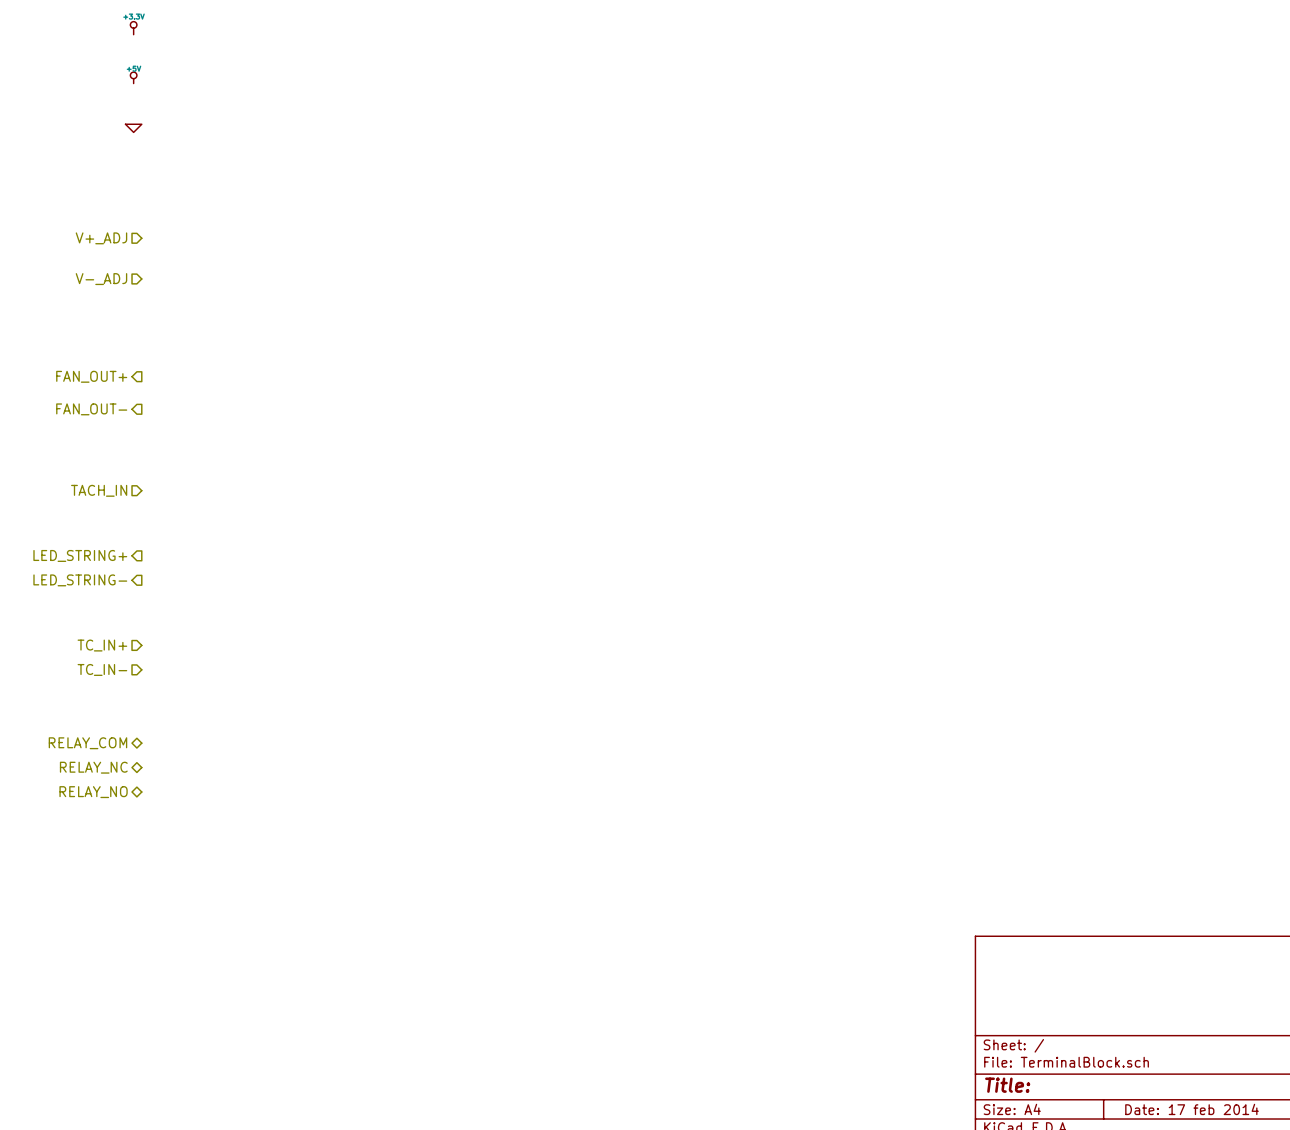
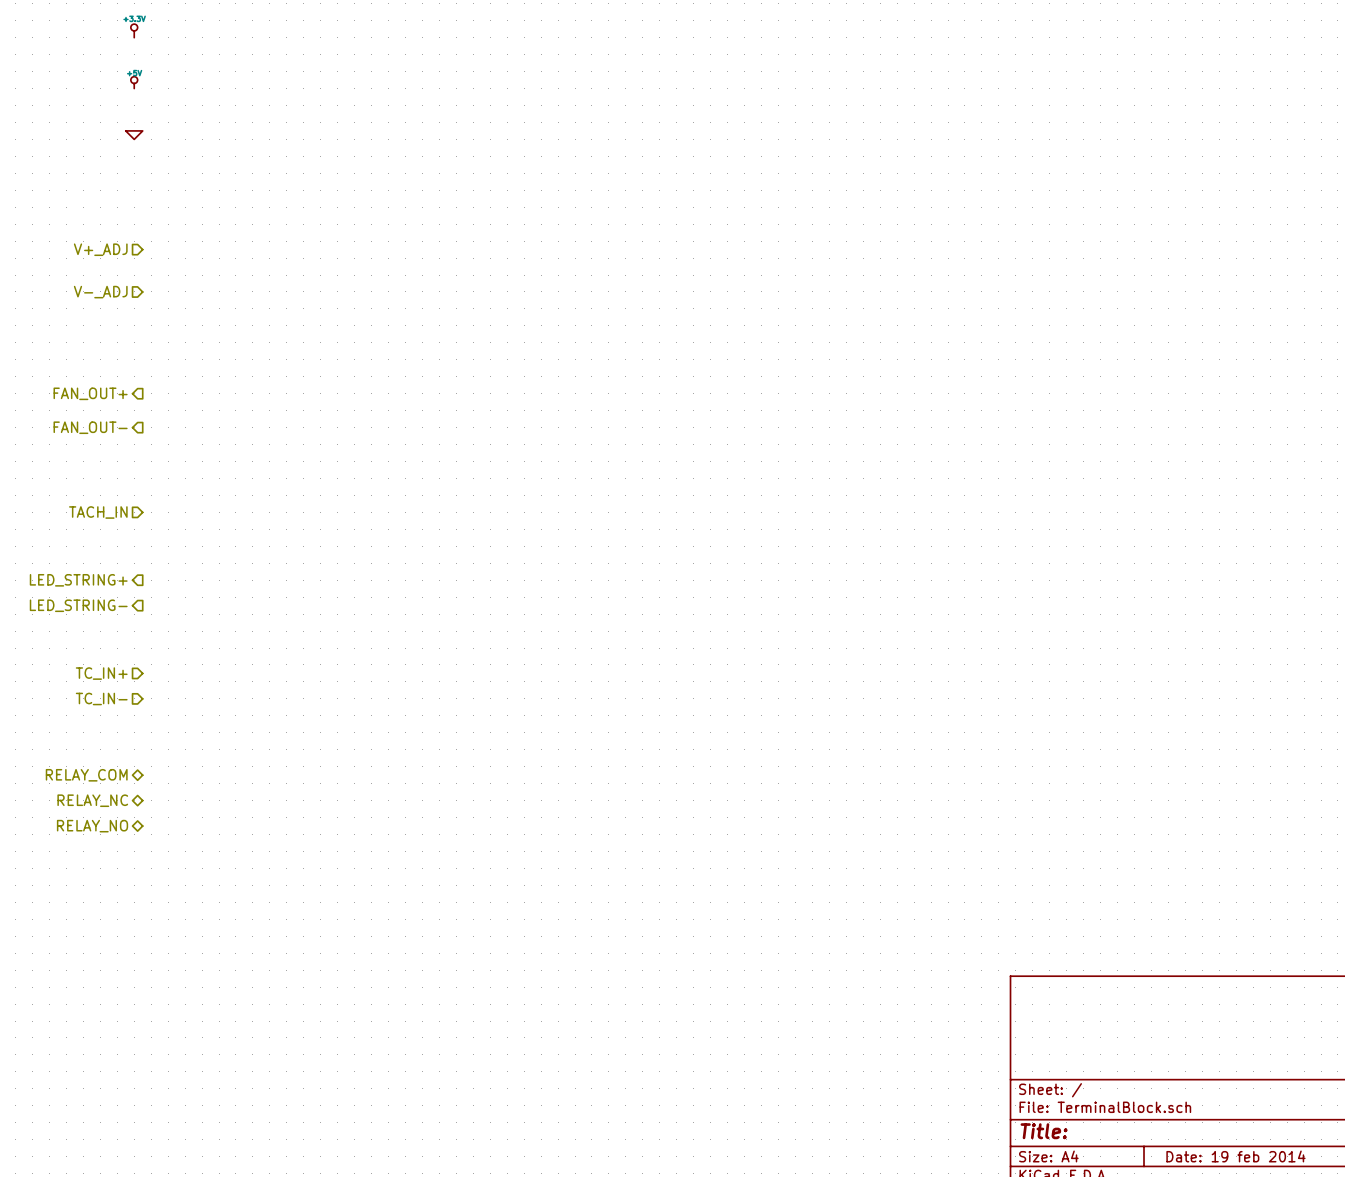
title block: Date: 17 feb 2014 (1192, 1109) -> Date: 19 feb 2014 (1235, 1156)

